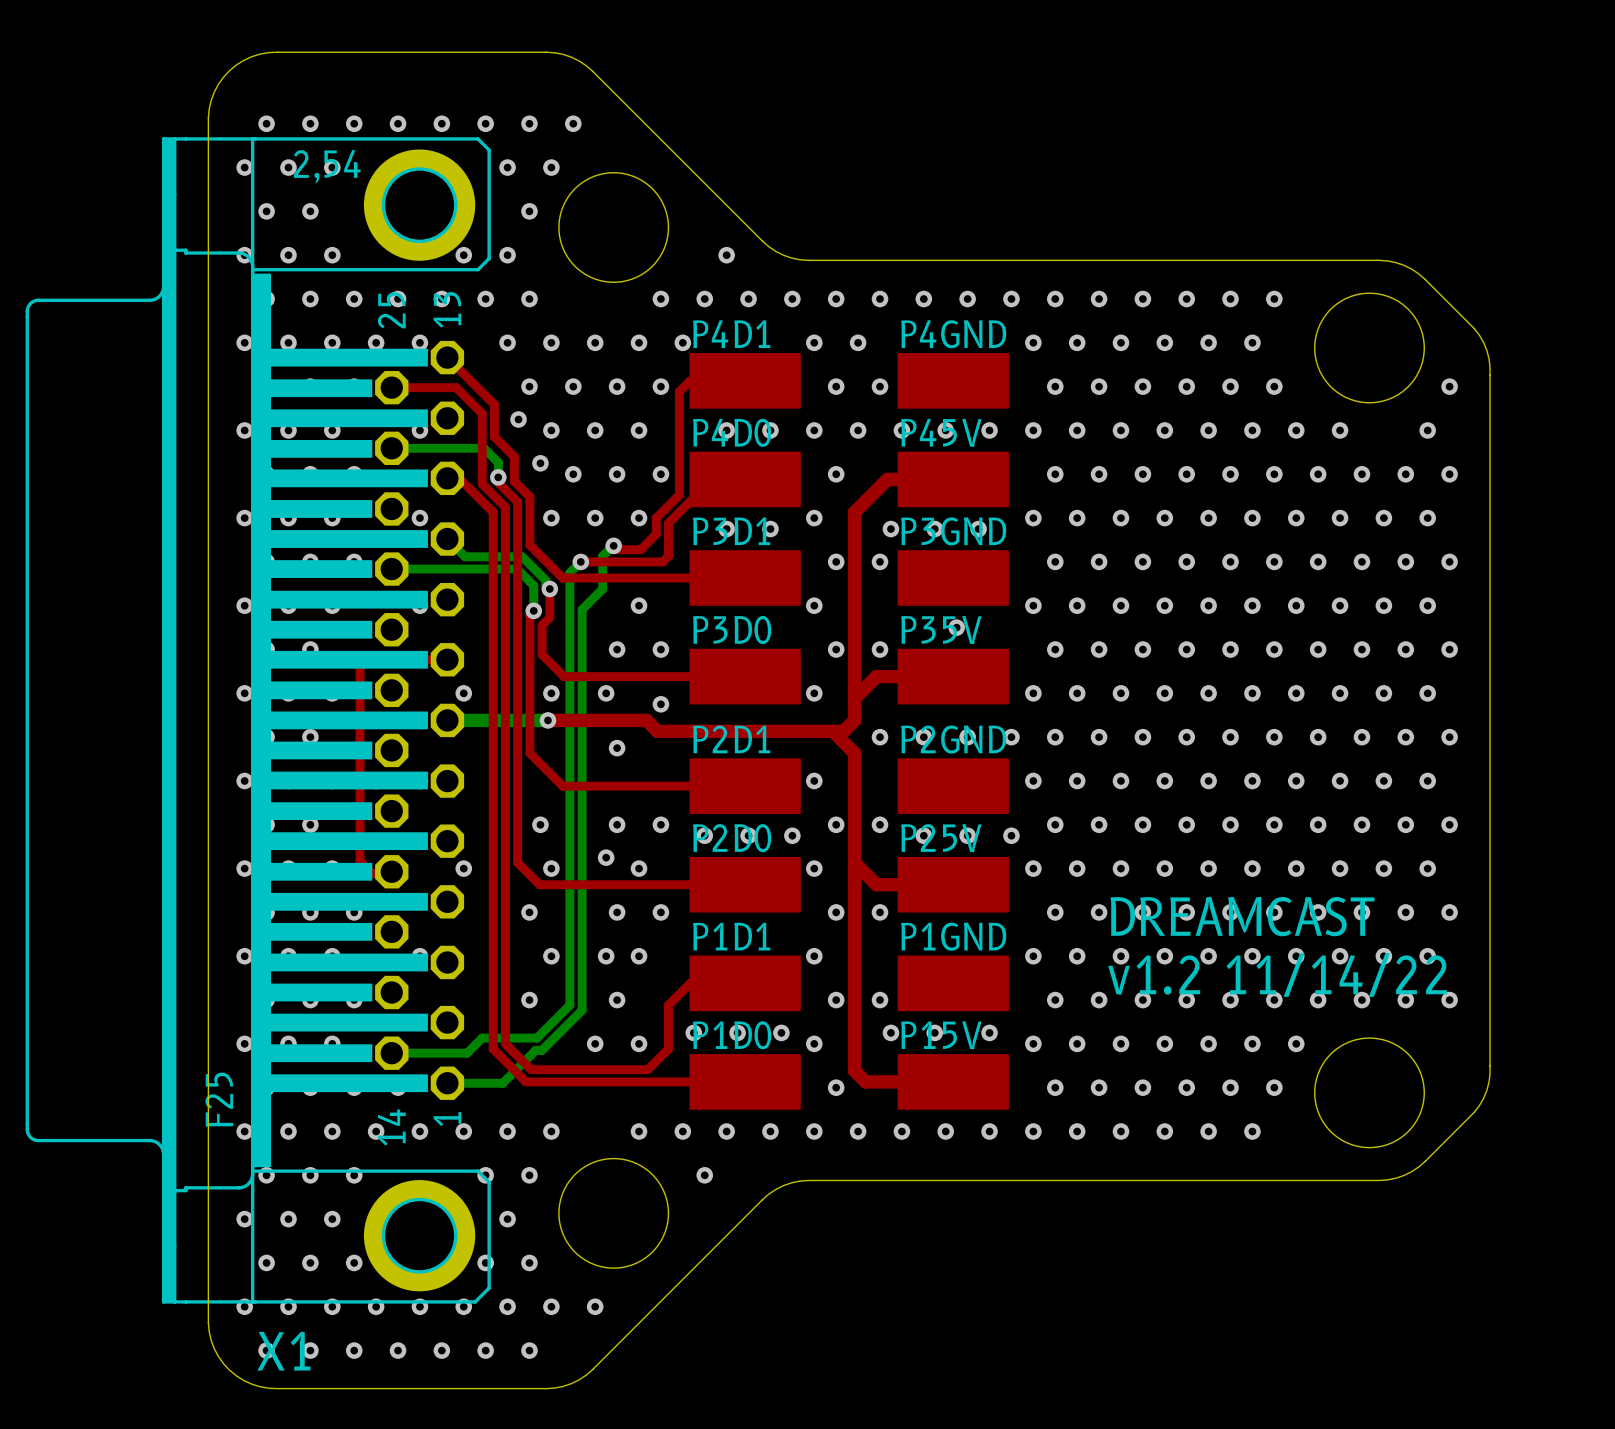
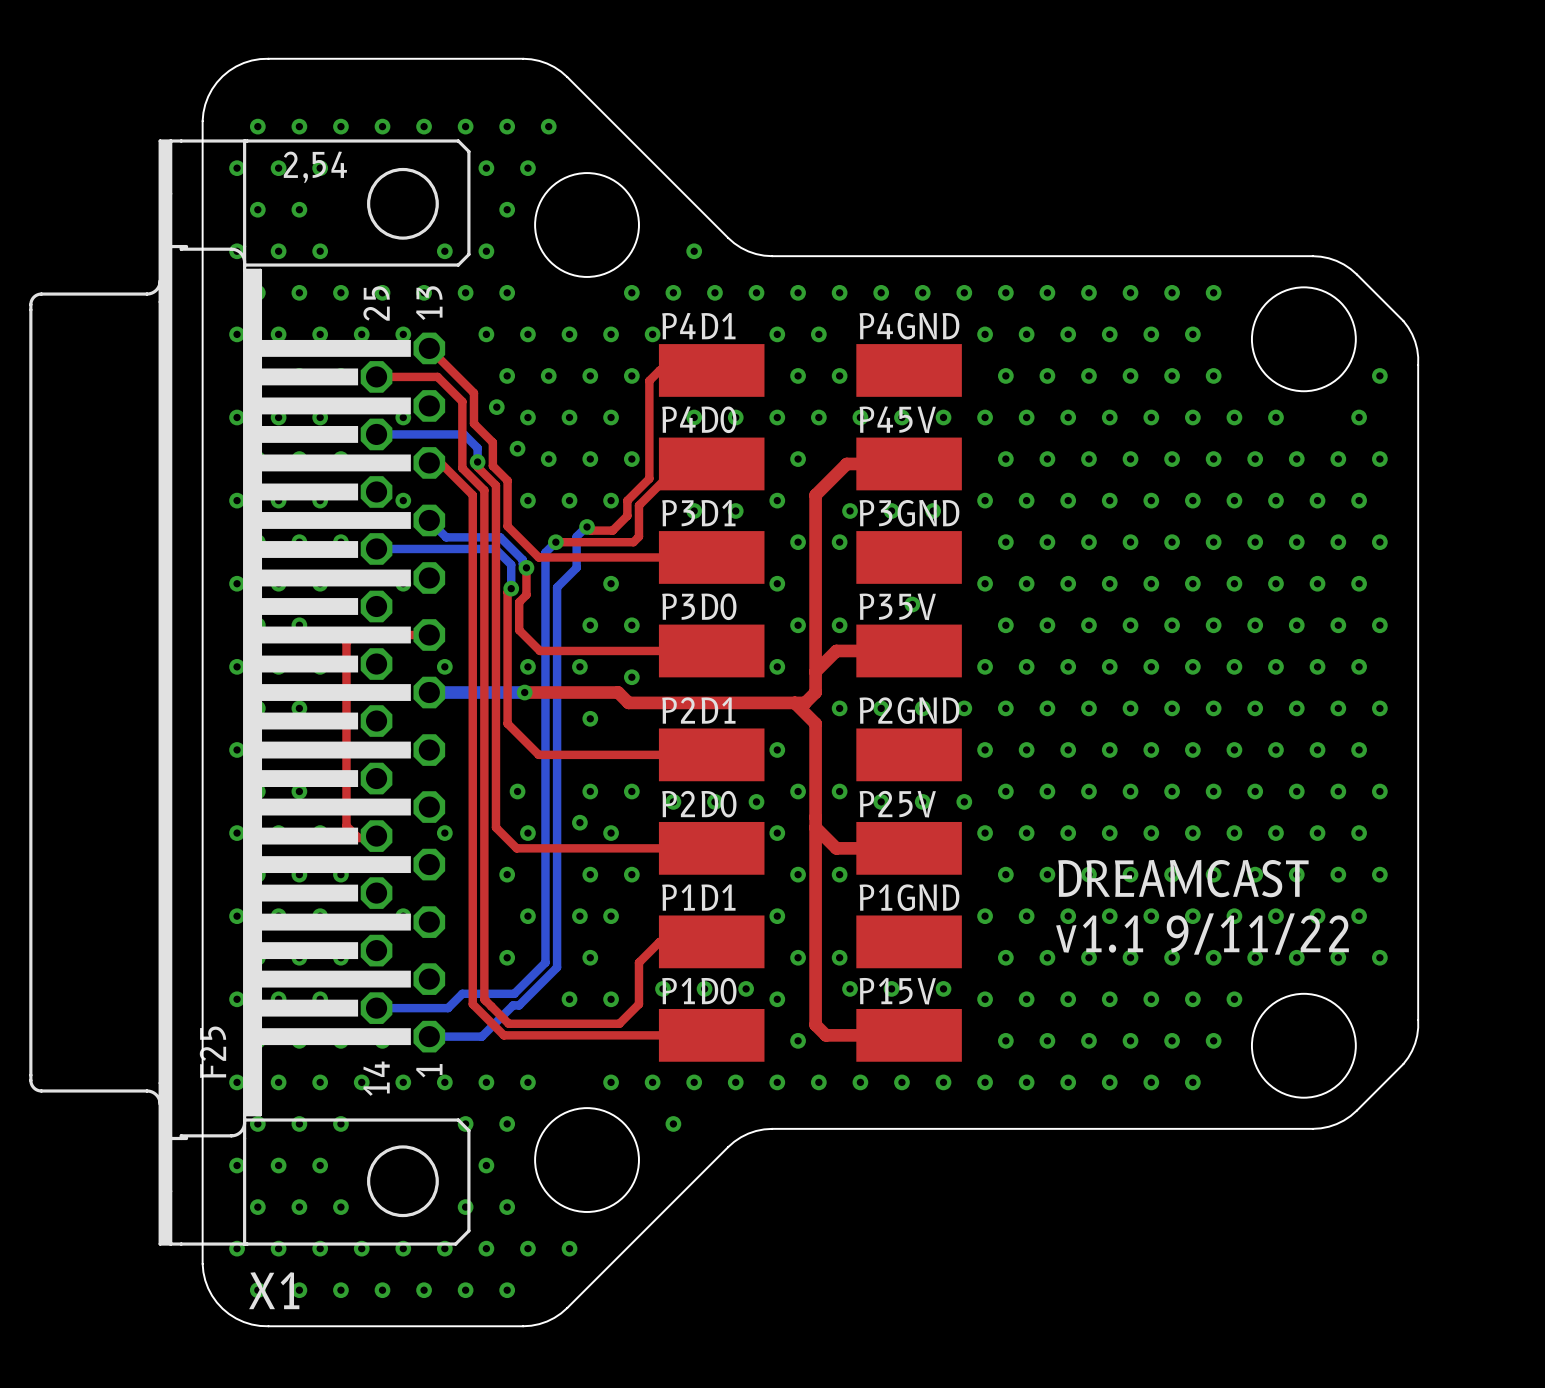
X1 footprint: [25, 137, 491, 1304] -> [29, 139, 471, 1246]
text: v1.2 11/14/22 (1277, 975) -> v1.1 9/11/22 (1202, 934)

